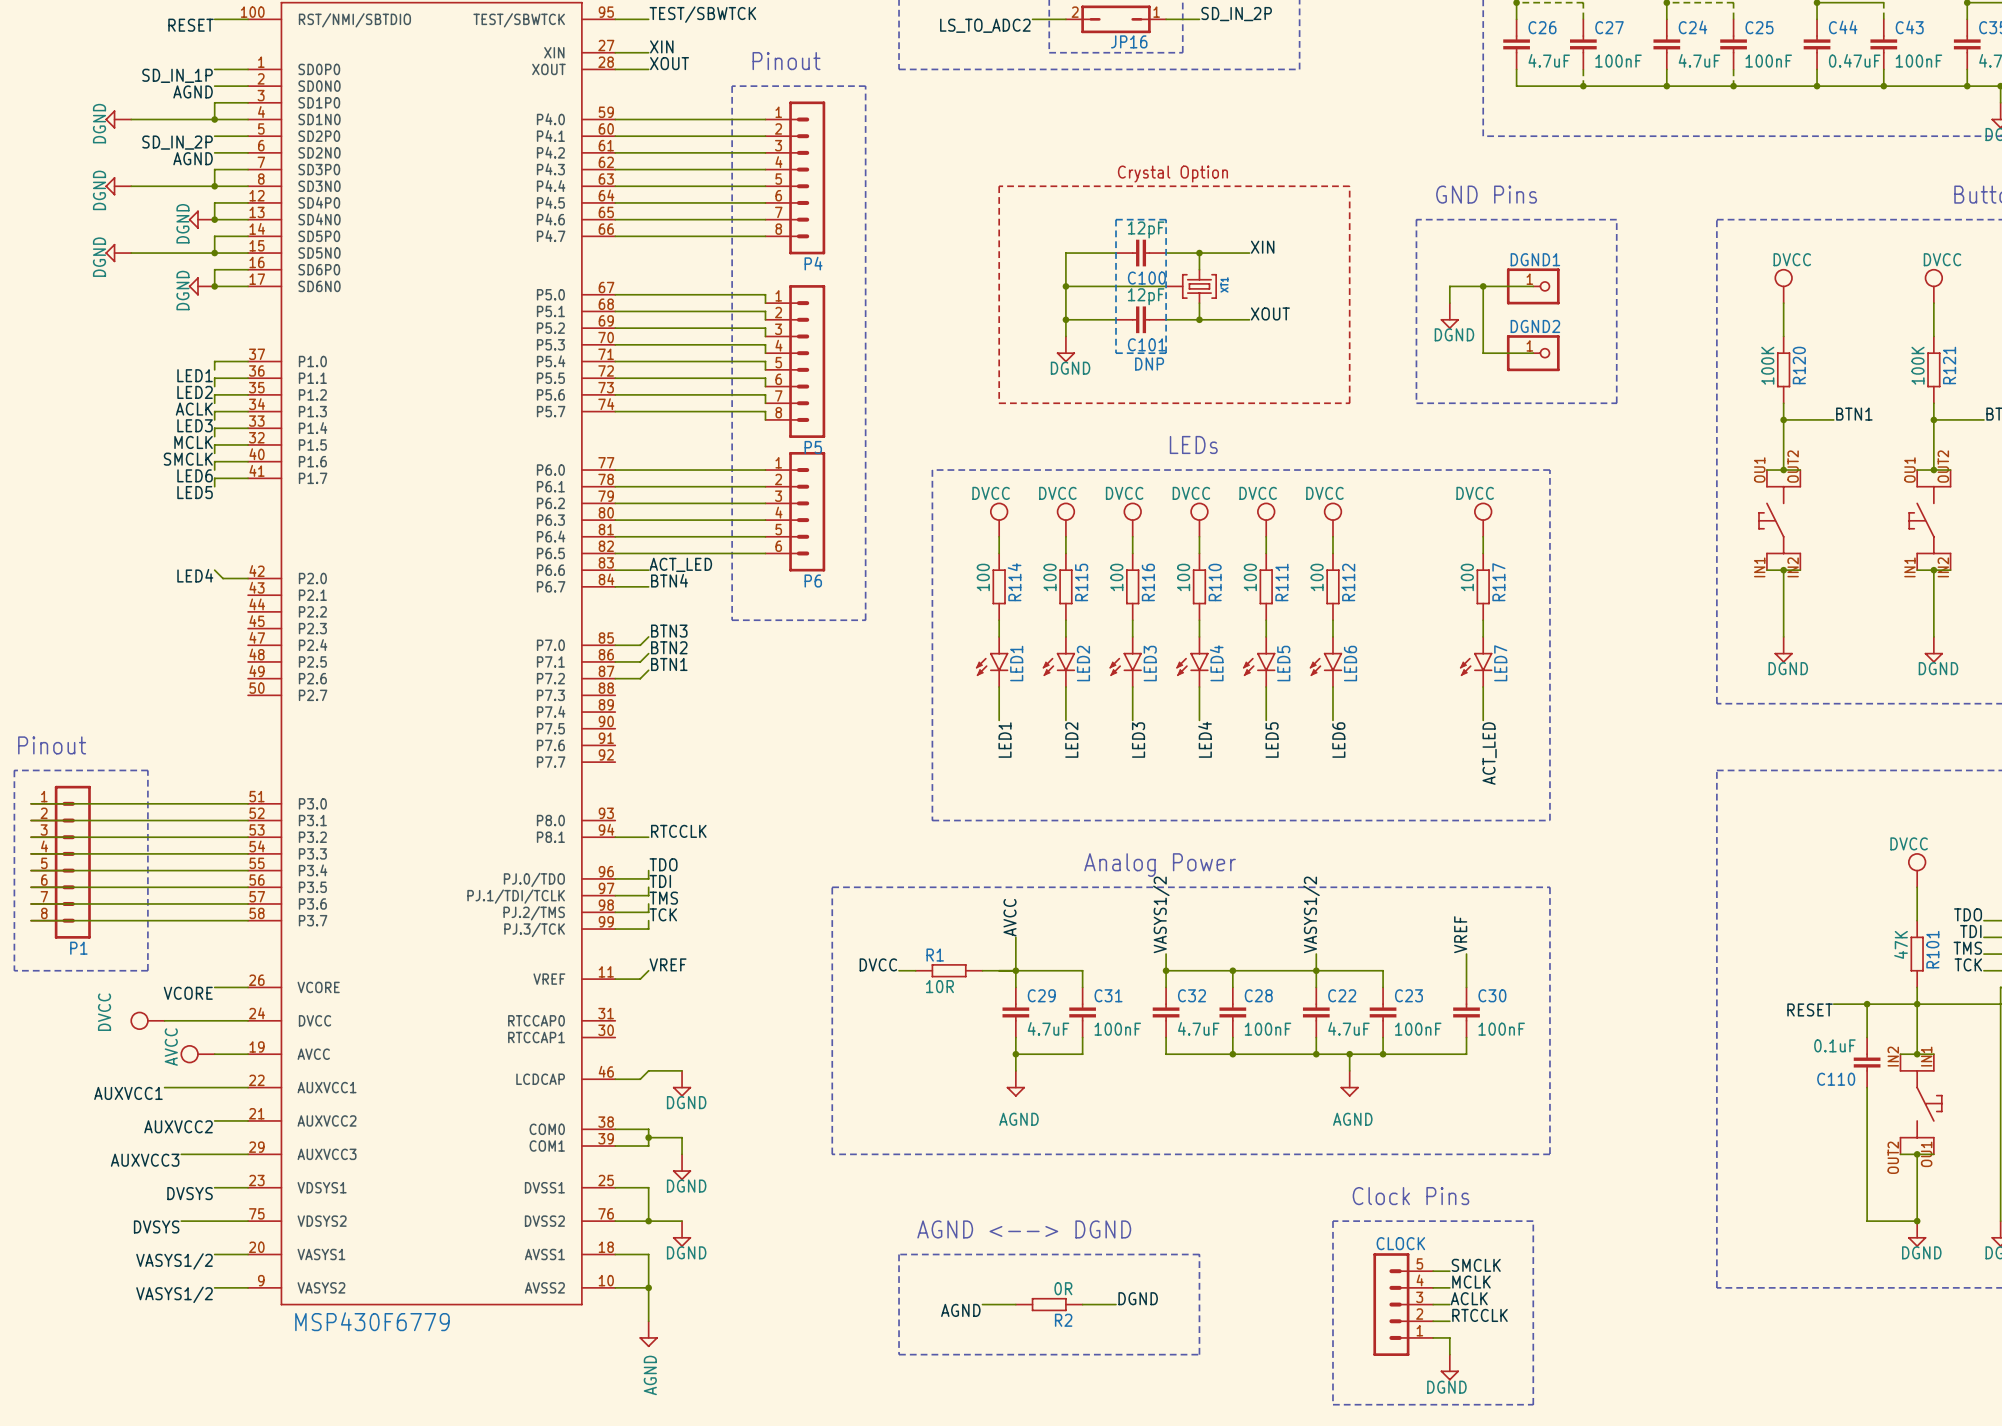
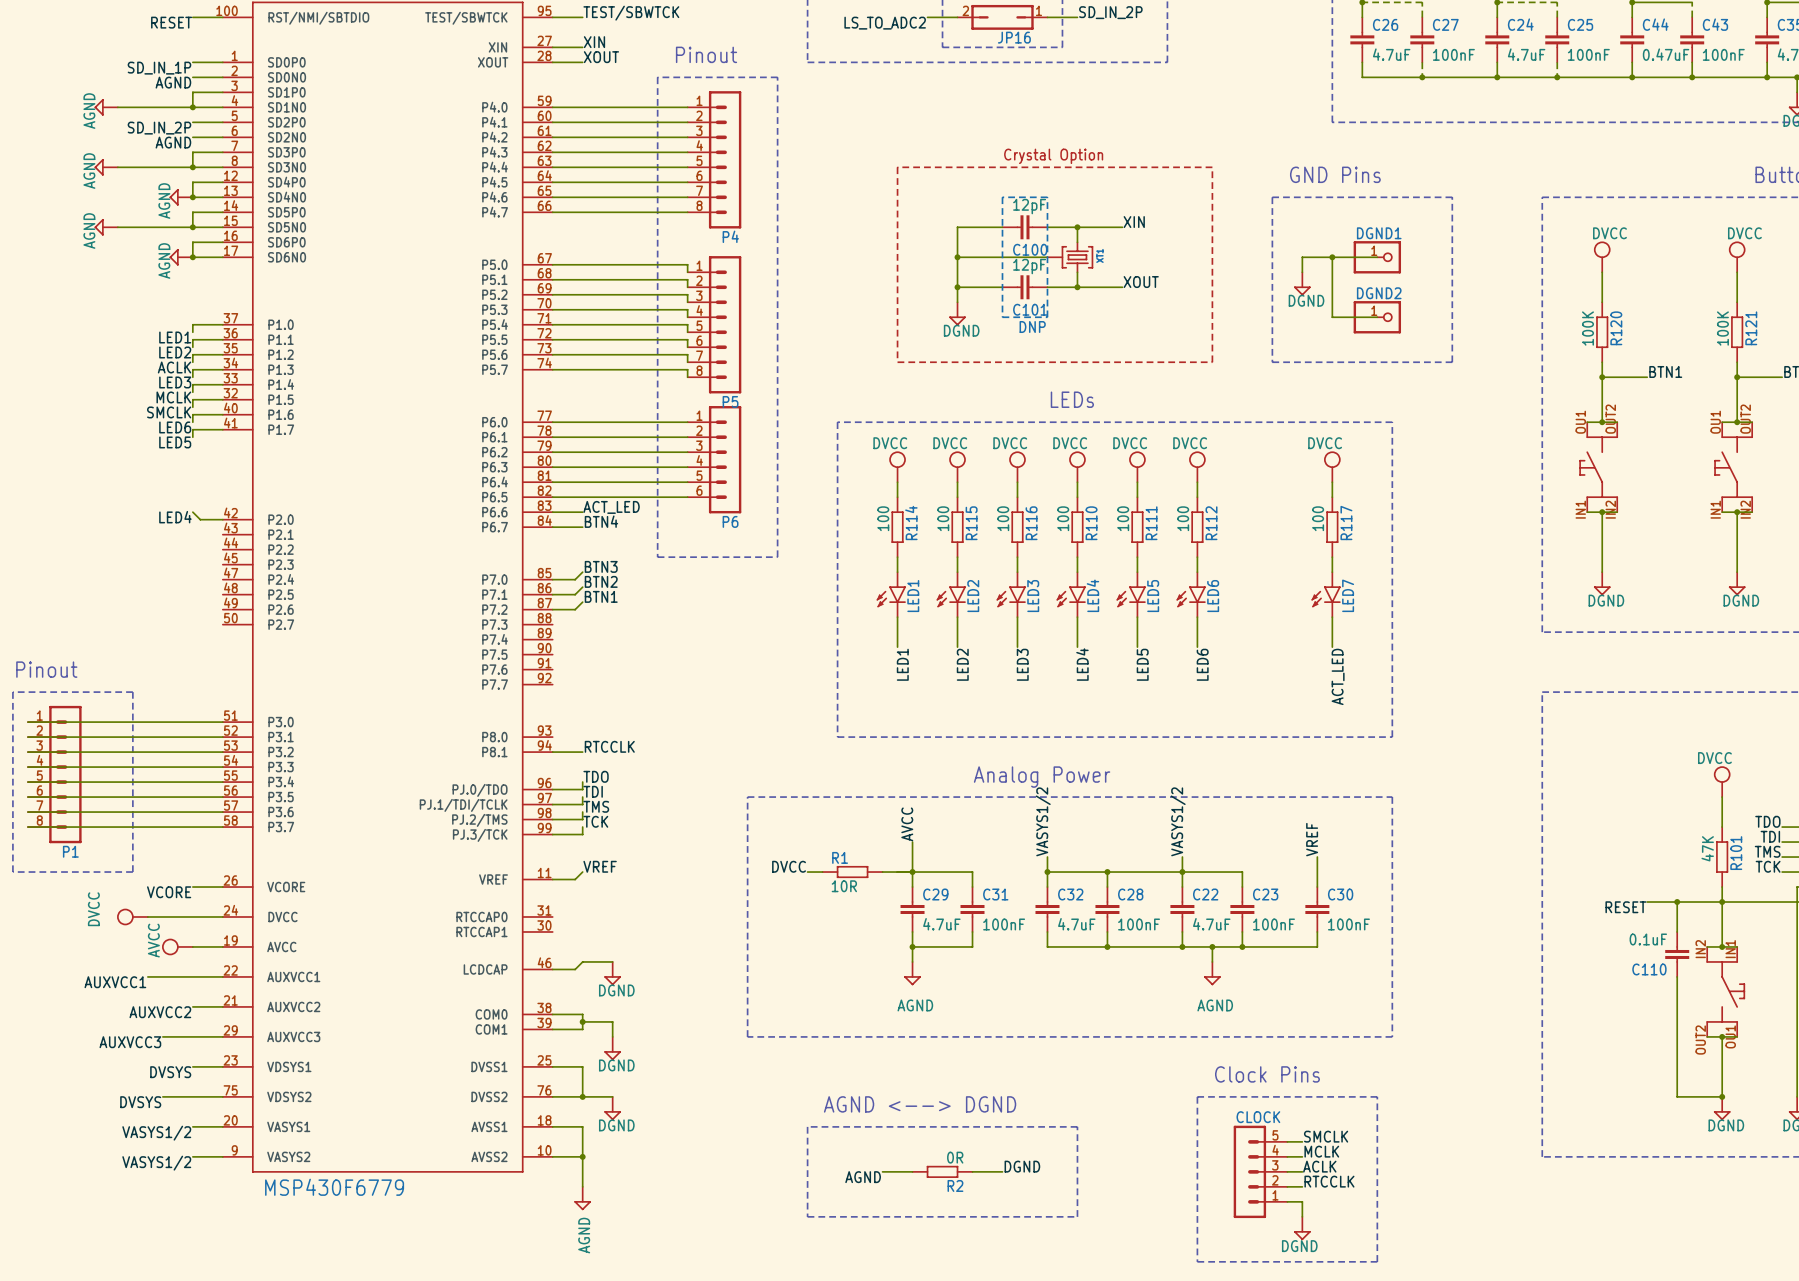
power symbol: DGND (118, 119) -> AGND (106, 107)
power symbol: DGND (118, 186) -> AGND (106, 167)
power symbol: DGND (201, 219) -> AGND (181, 197)
power symbol: DGND (118, 253) -> AGND (106, 227)
power symbol: DGND (201, 286) -> AGND (181, 257)

